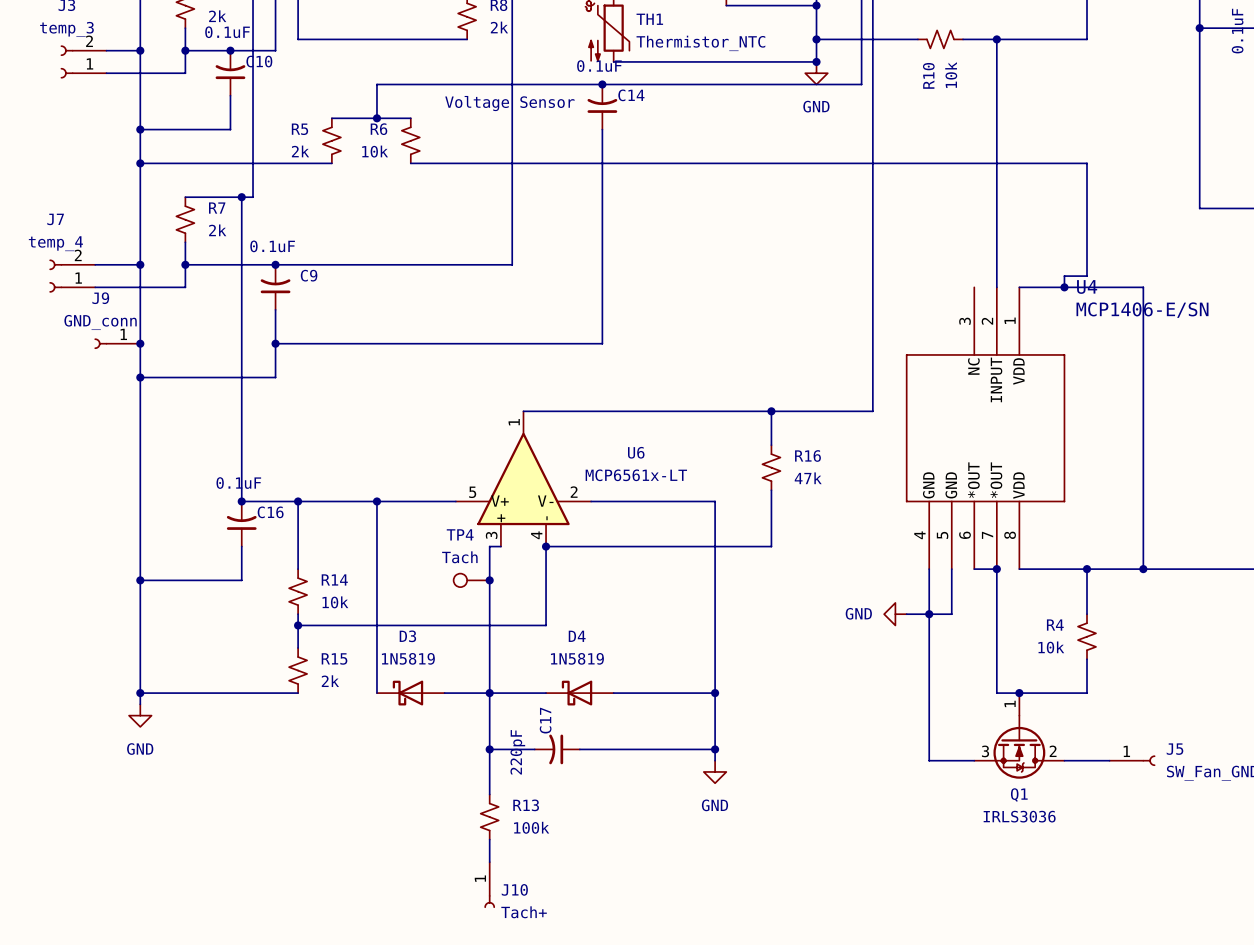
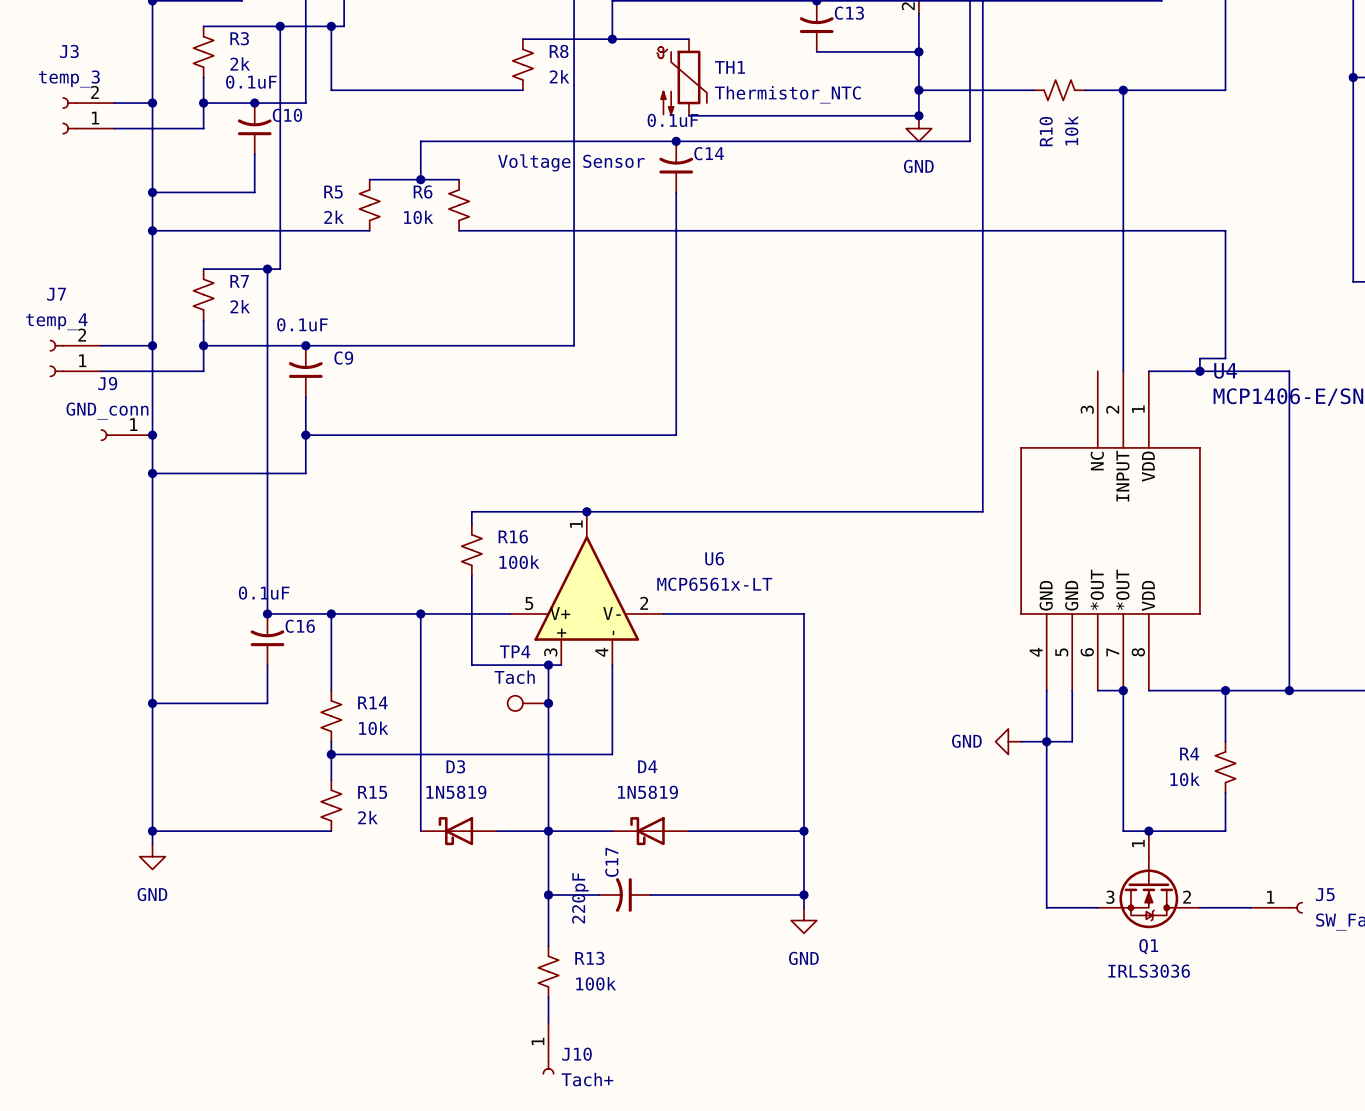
wire: none -> (586, 511) (471, 511) (471, 524)
junction: none -> (586, 511)
wire: (771, 411) (771, 445) -> none
junction: (771, 411) -> none
wire: none -> (471, 575) (471, 665) (548, 665)
R16 position: (771, 467) -> (471, 550)
R16 value: 47k (808, 478) -> 100k (519, 562)
wire: (771, 490) (771, 546) (546, 546) -> none
junction: none -> (548, 665)
junction: (546, 546) -> none

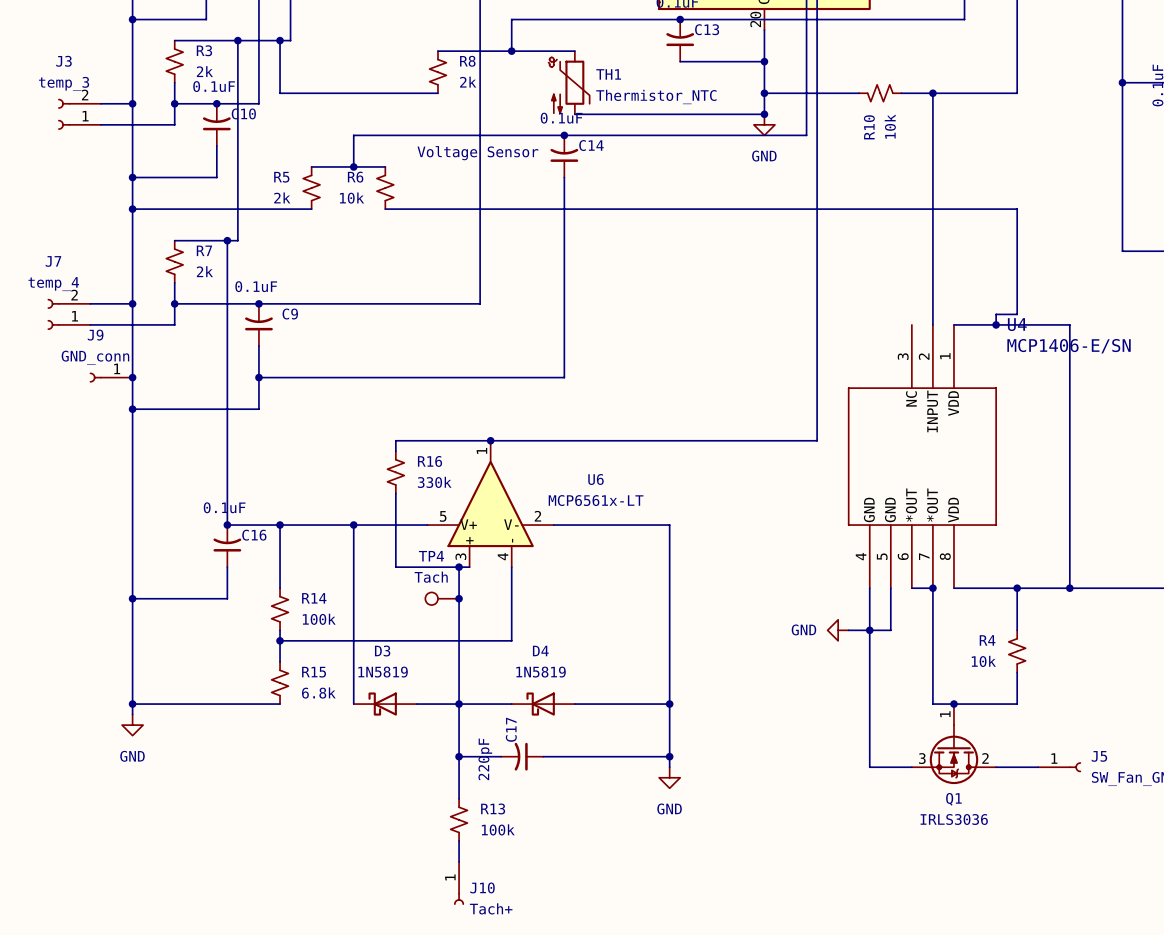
R16 value: 100k (519, 562) -> 330k (434, 482)
R14 value: 10k (373, 728) -> 100k (319, 619)
R15 value: 2k (367, 817) -> 6.8k (318, 693)

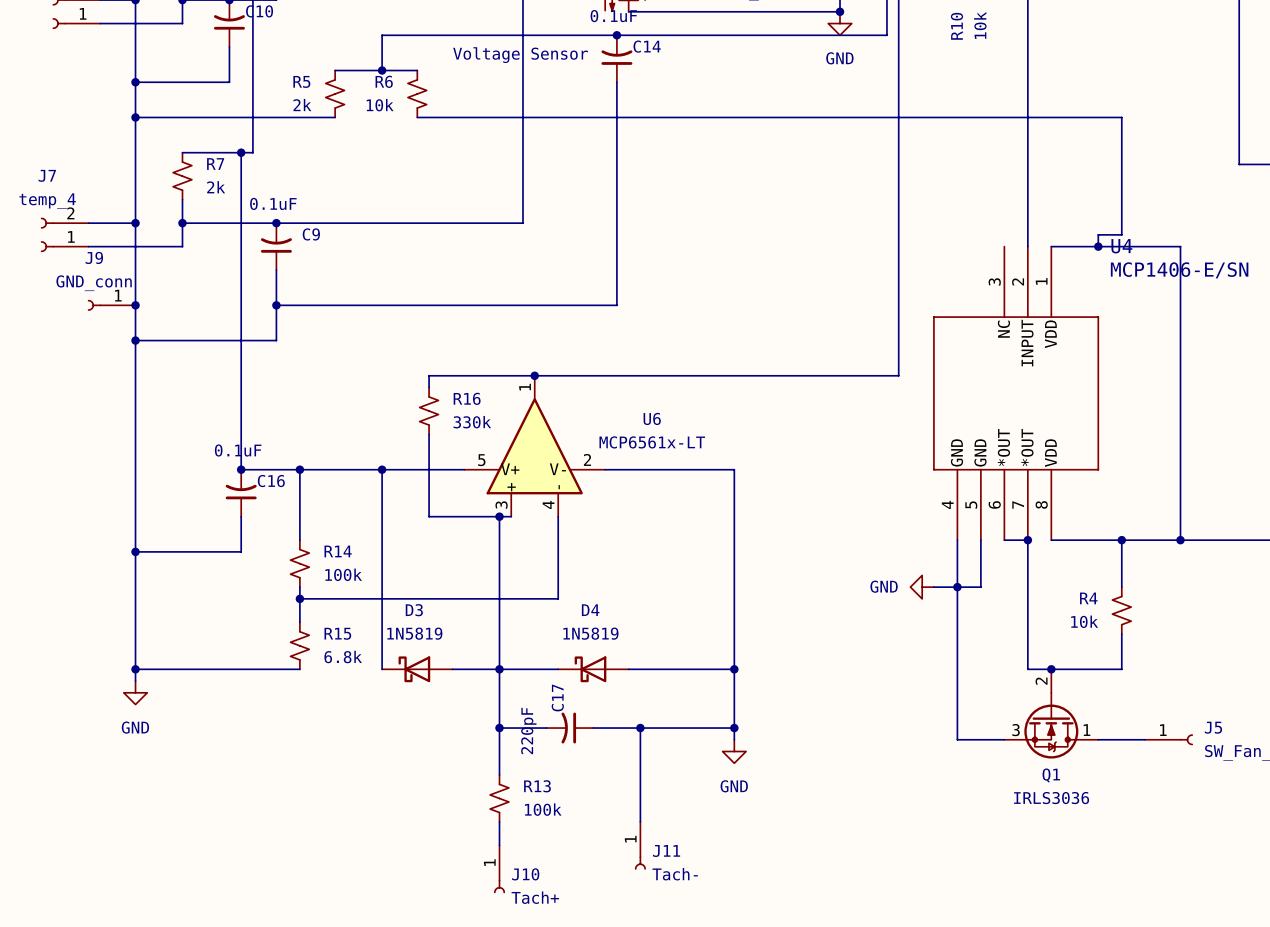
TP4: Tach (442, 598) -> none
junction: (459, 598) -> none
Q1 pin number: 1 (945, 714) -> 2 (1041, 681)
wire: none -> (640, 728) (640, 821)
junction: none -> (640, 728)
Q1 pin number: 2 (985, 758) -> 1 (1086, 730)
J11: none -> Tach- (640, 845)

